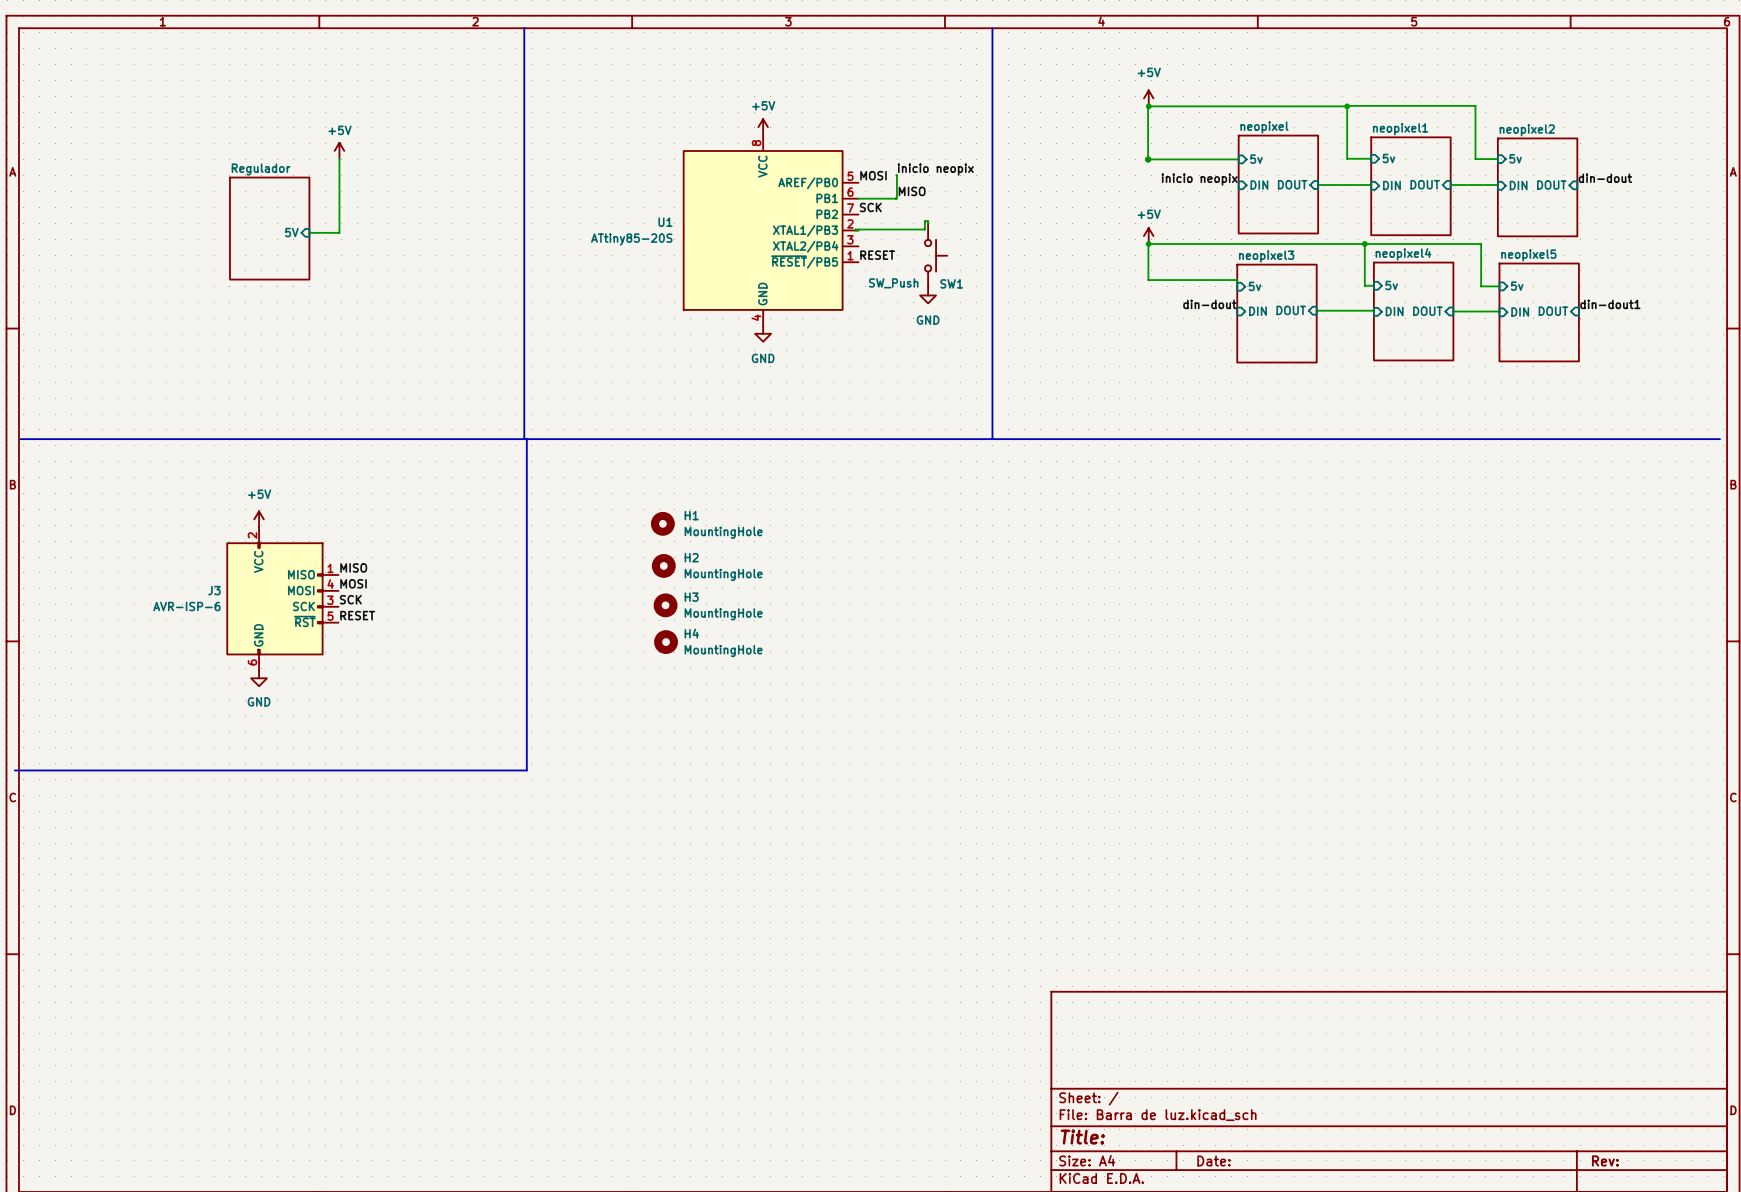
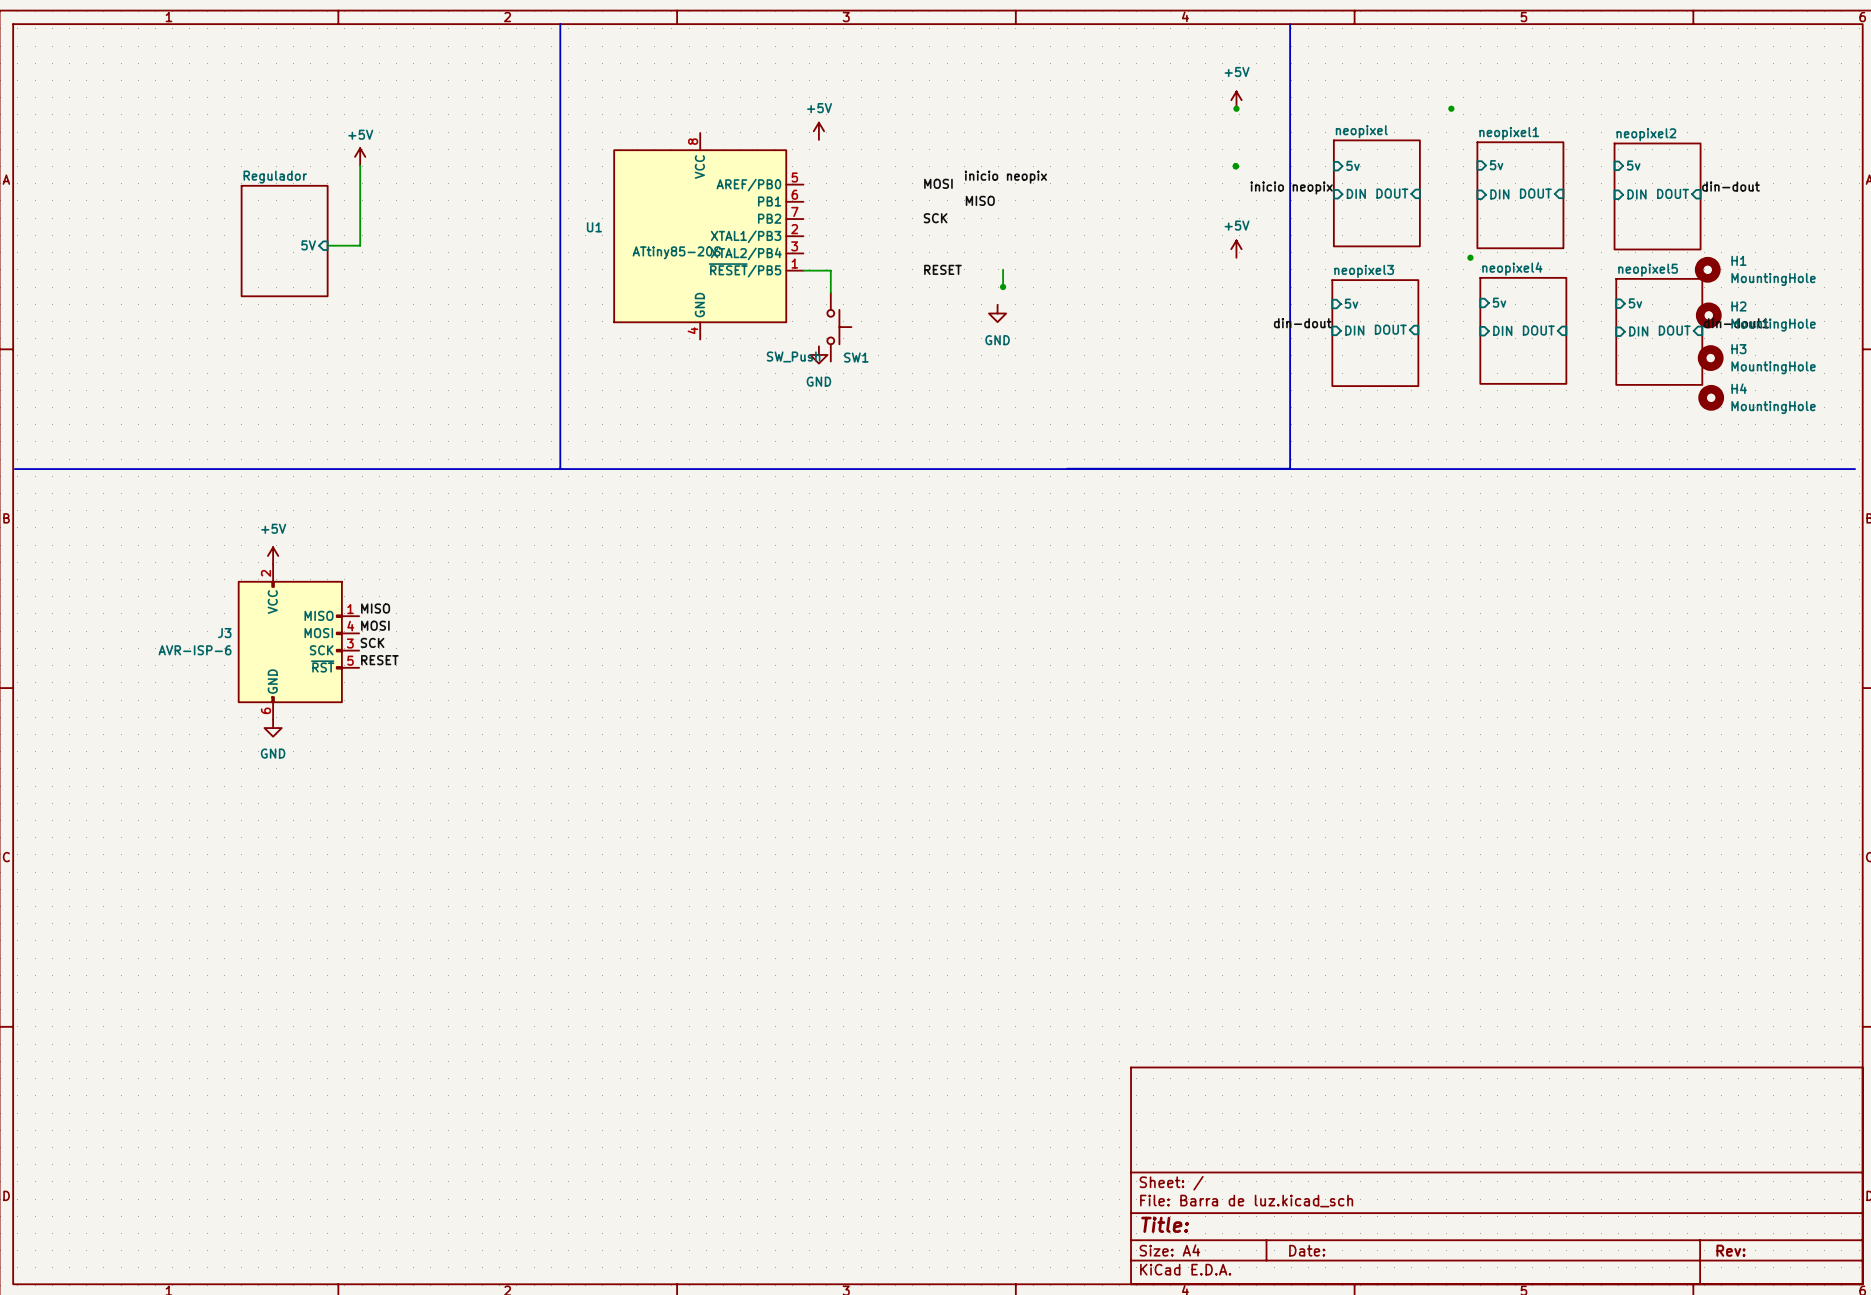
bus: (992, 28) (992, 438) -> (1290, 24) (1290, 468) (1067, 468)
wire: (1347, 106) (1148, 106) (1148, 159) -> none
wire: (1371, 158) (1347, 158) (1347, 105) (1475, 105) (1475, 159) (1497, 159) -> none
wire: (1148, 159) (1238, 159) -> none
wire: (896, 175) (896, 198) (858, 198) -> none
wire: (1318, 185) (1371, 185) -> none
wire: (1450, 185) (1497, 185) -> none
wire: (928, 223) (928, 221) (924, 221) (924, 229) (855, 229) (858, 230) -> none
U1 position: (770, 230) -> (708, 236)
junction: (1148, 243) -> none
wire: (1364, 243) (1364, 285) (1373, 285) -> none
wire: none -> (1003, 269) (1003, 287)
SW1 position: (936, 255) -> (839, 327)
junction: none -> (1003, 287)
wire: (1499, 286) (1481, 286) (1481, 243) (1148, 243) (1148, 280) (1237, 280) (1237, 286) -> none
wire: (1316, 310) (1373, 311) -> none
wire: (1453, 311) (1499, 312) -> none
bus: (526, 438) (526, 770) (14, 770) -> none
H1 position: (662, 523) -> (1707, 269)
H2 position: (663, 565) -> (1708, 315)
H3 position: (665, 605) -> (1710, 358)
H4 position: (666, 642) -> (1711, 397)

